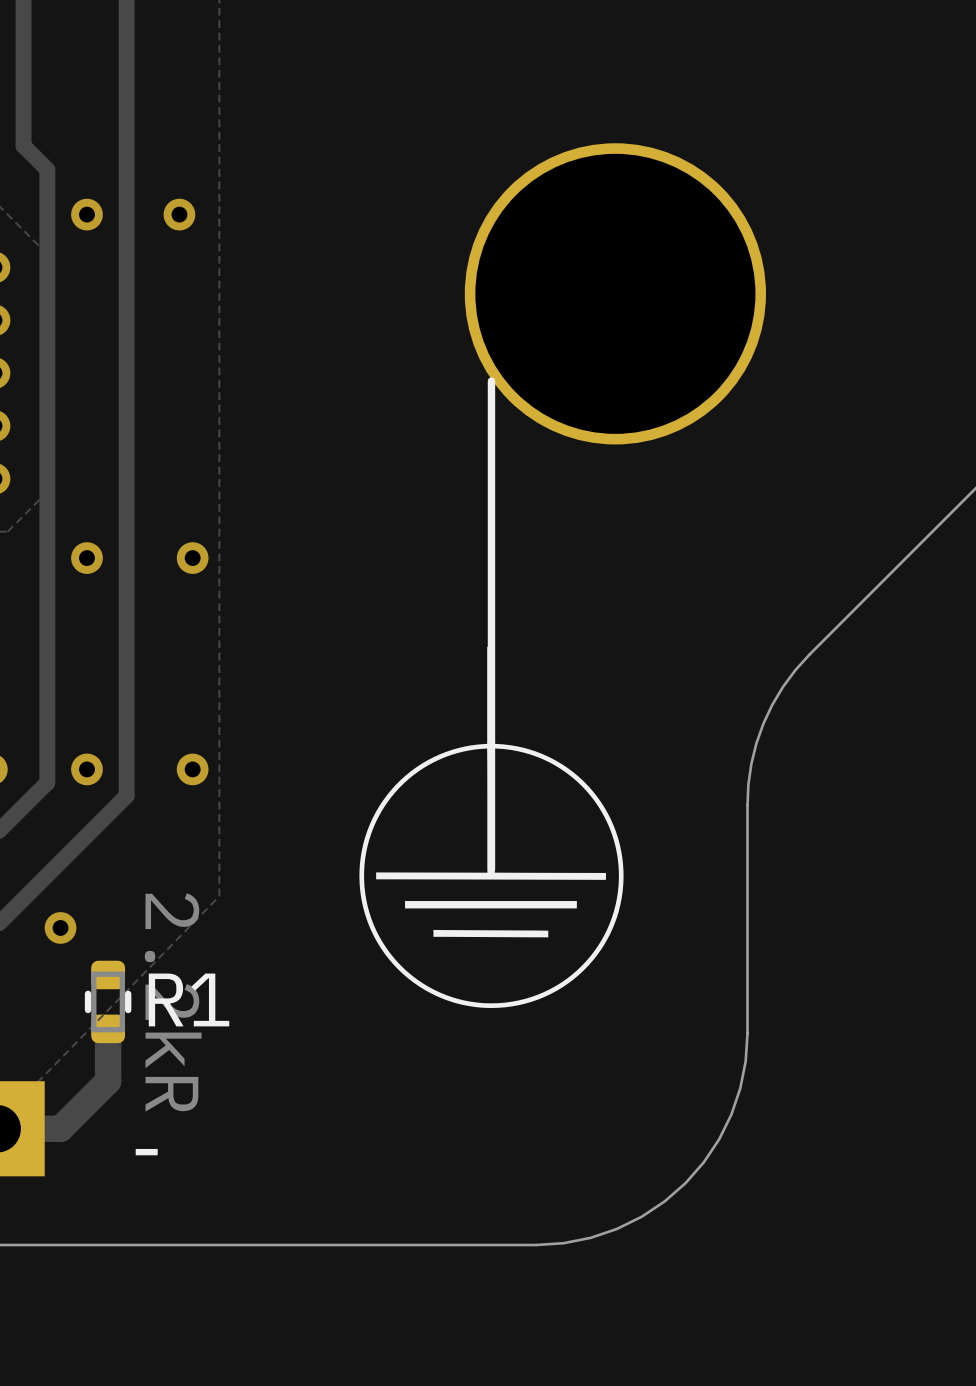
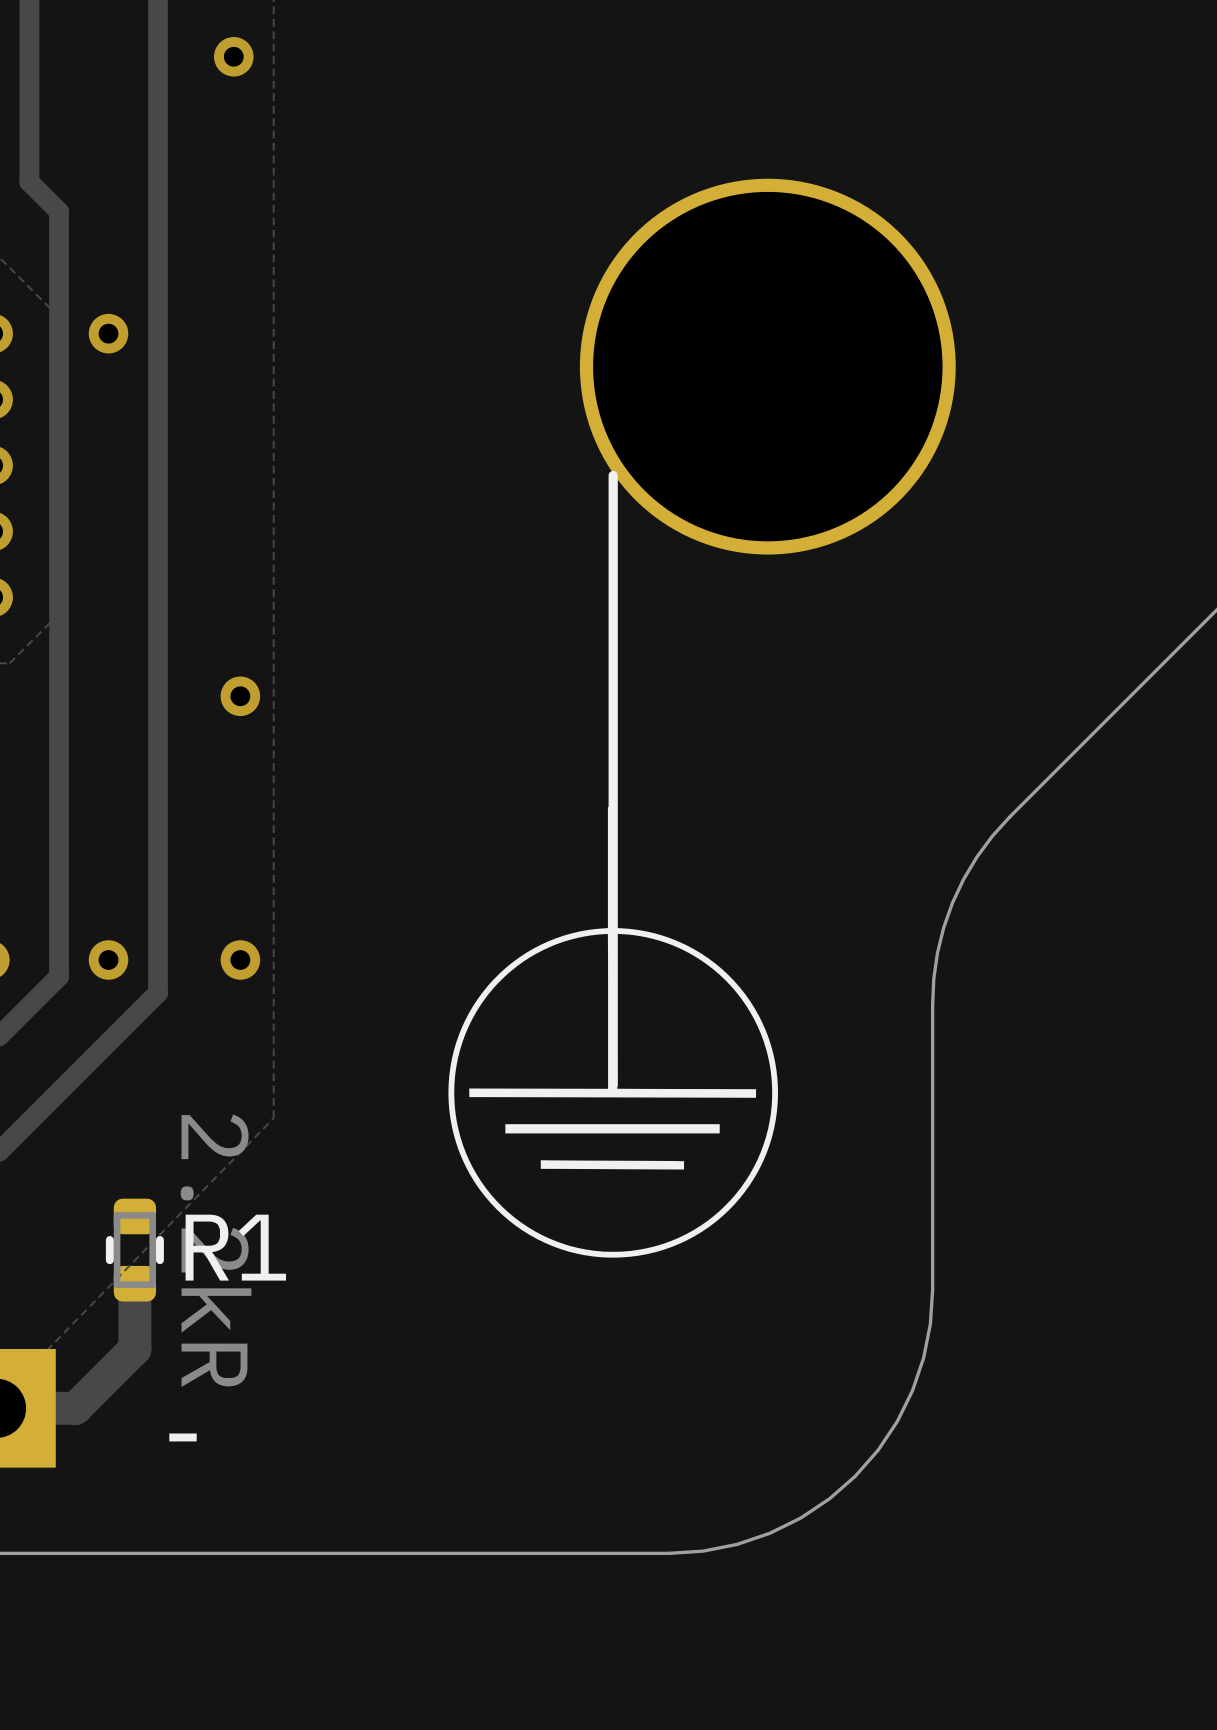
via: none -> (233, 56)
via: (86, 214) -> none
via: (179, 214) -> none
via: none -> (108, 333)
via: (86, 558) -> none
via: (60, 927) -> none

